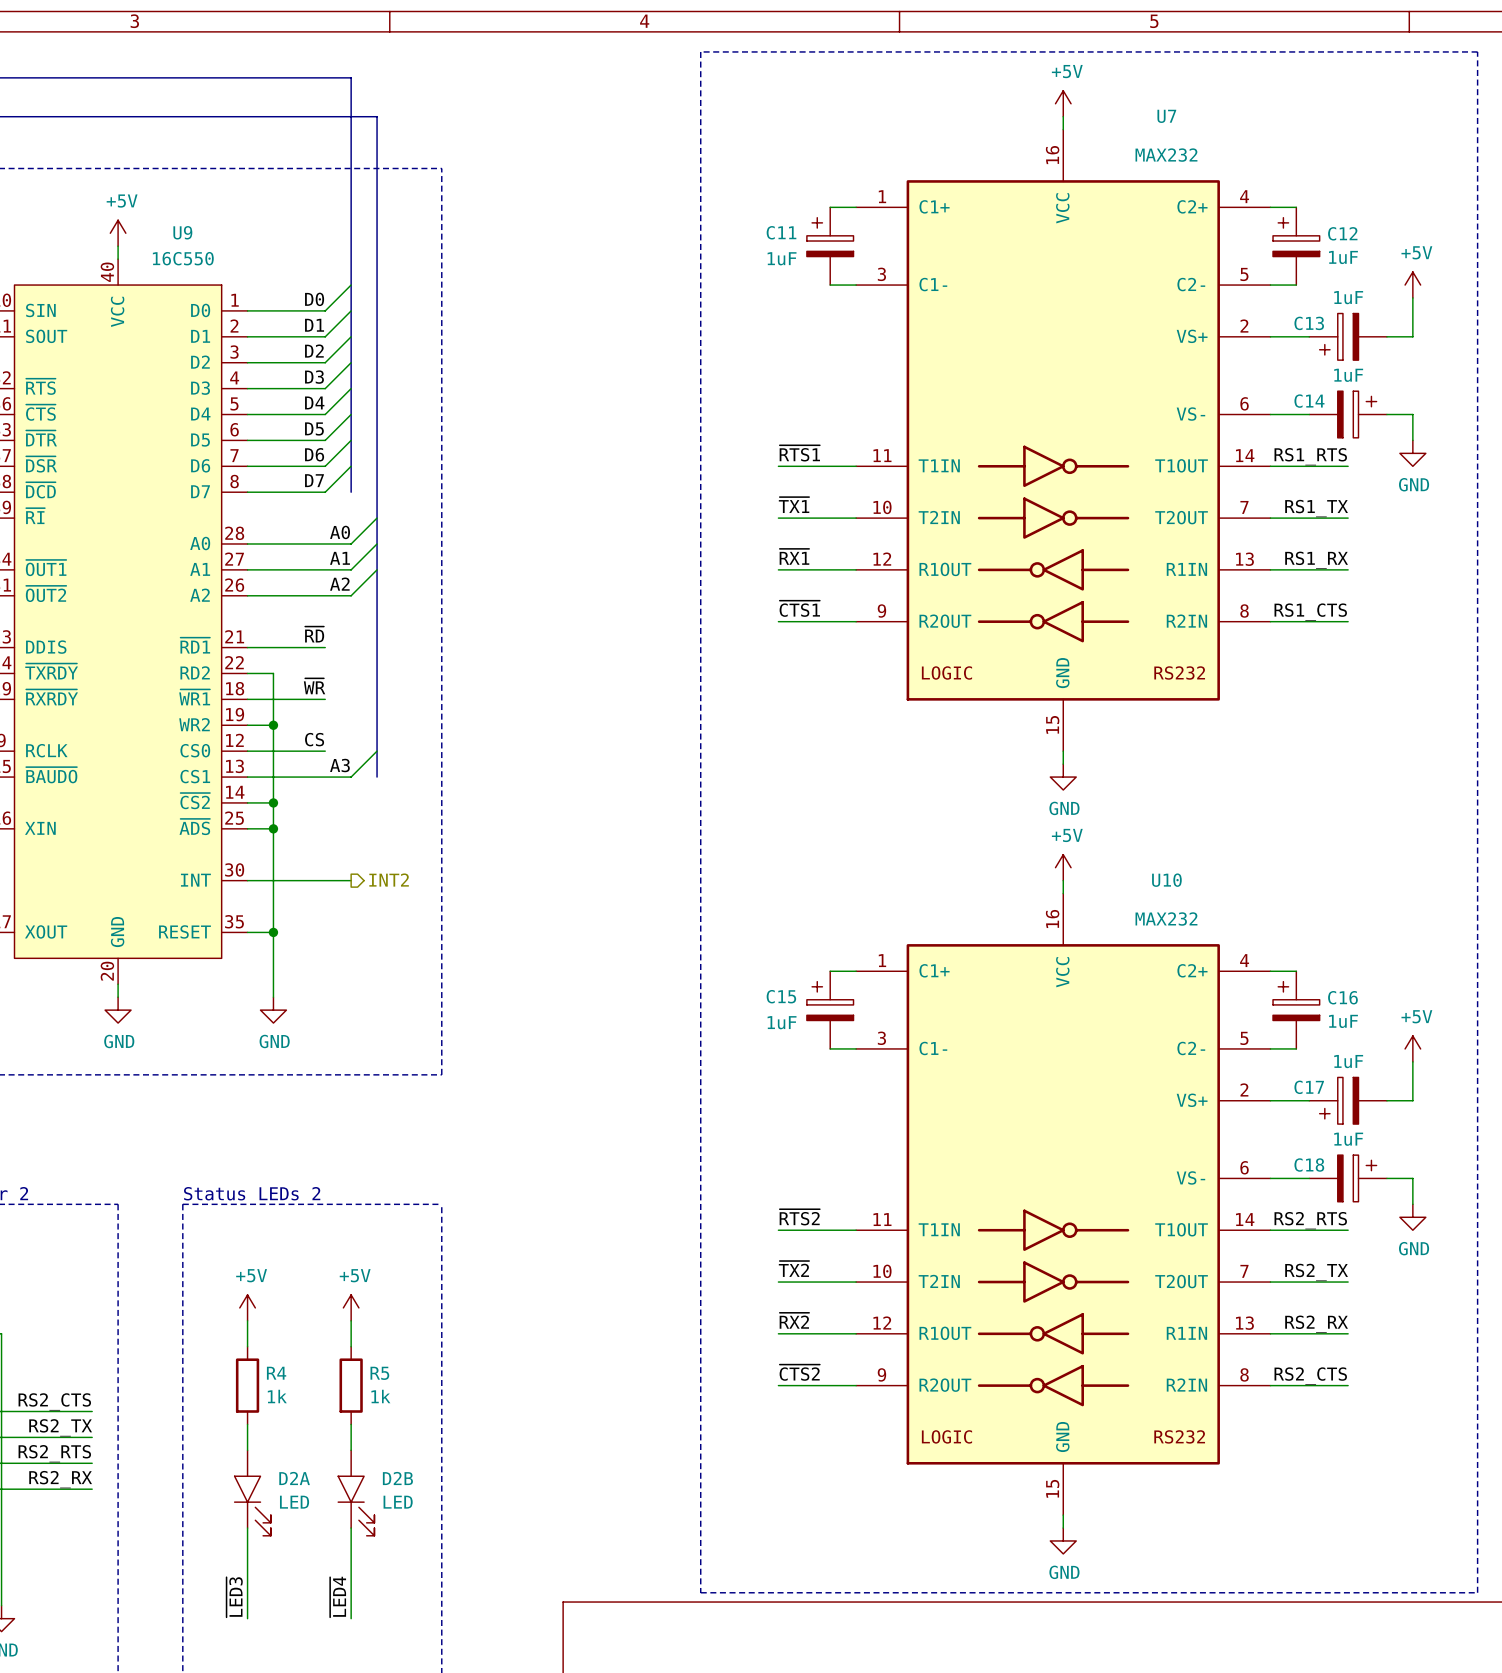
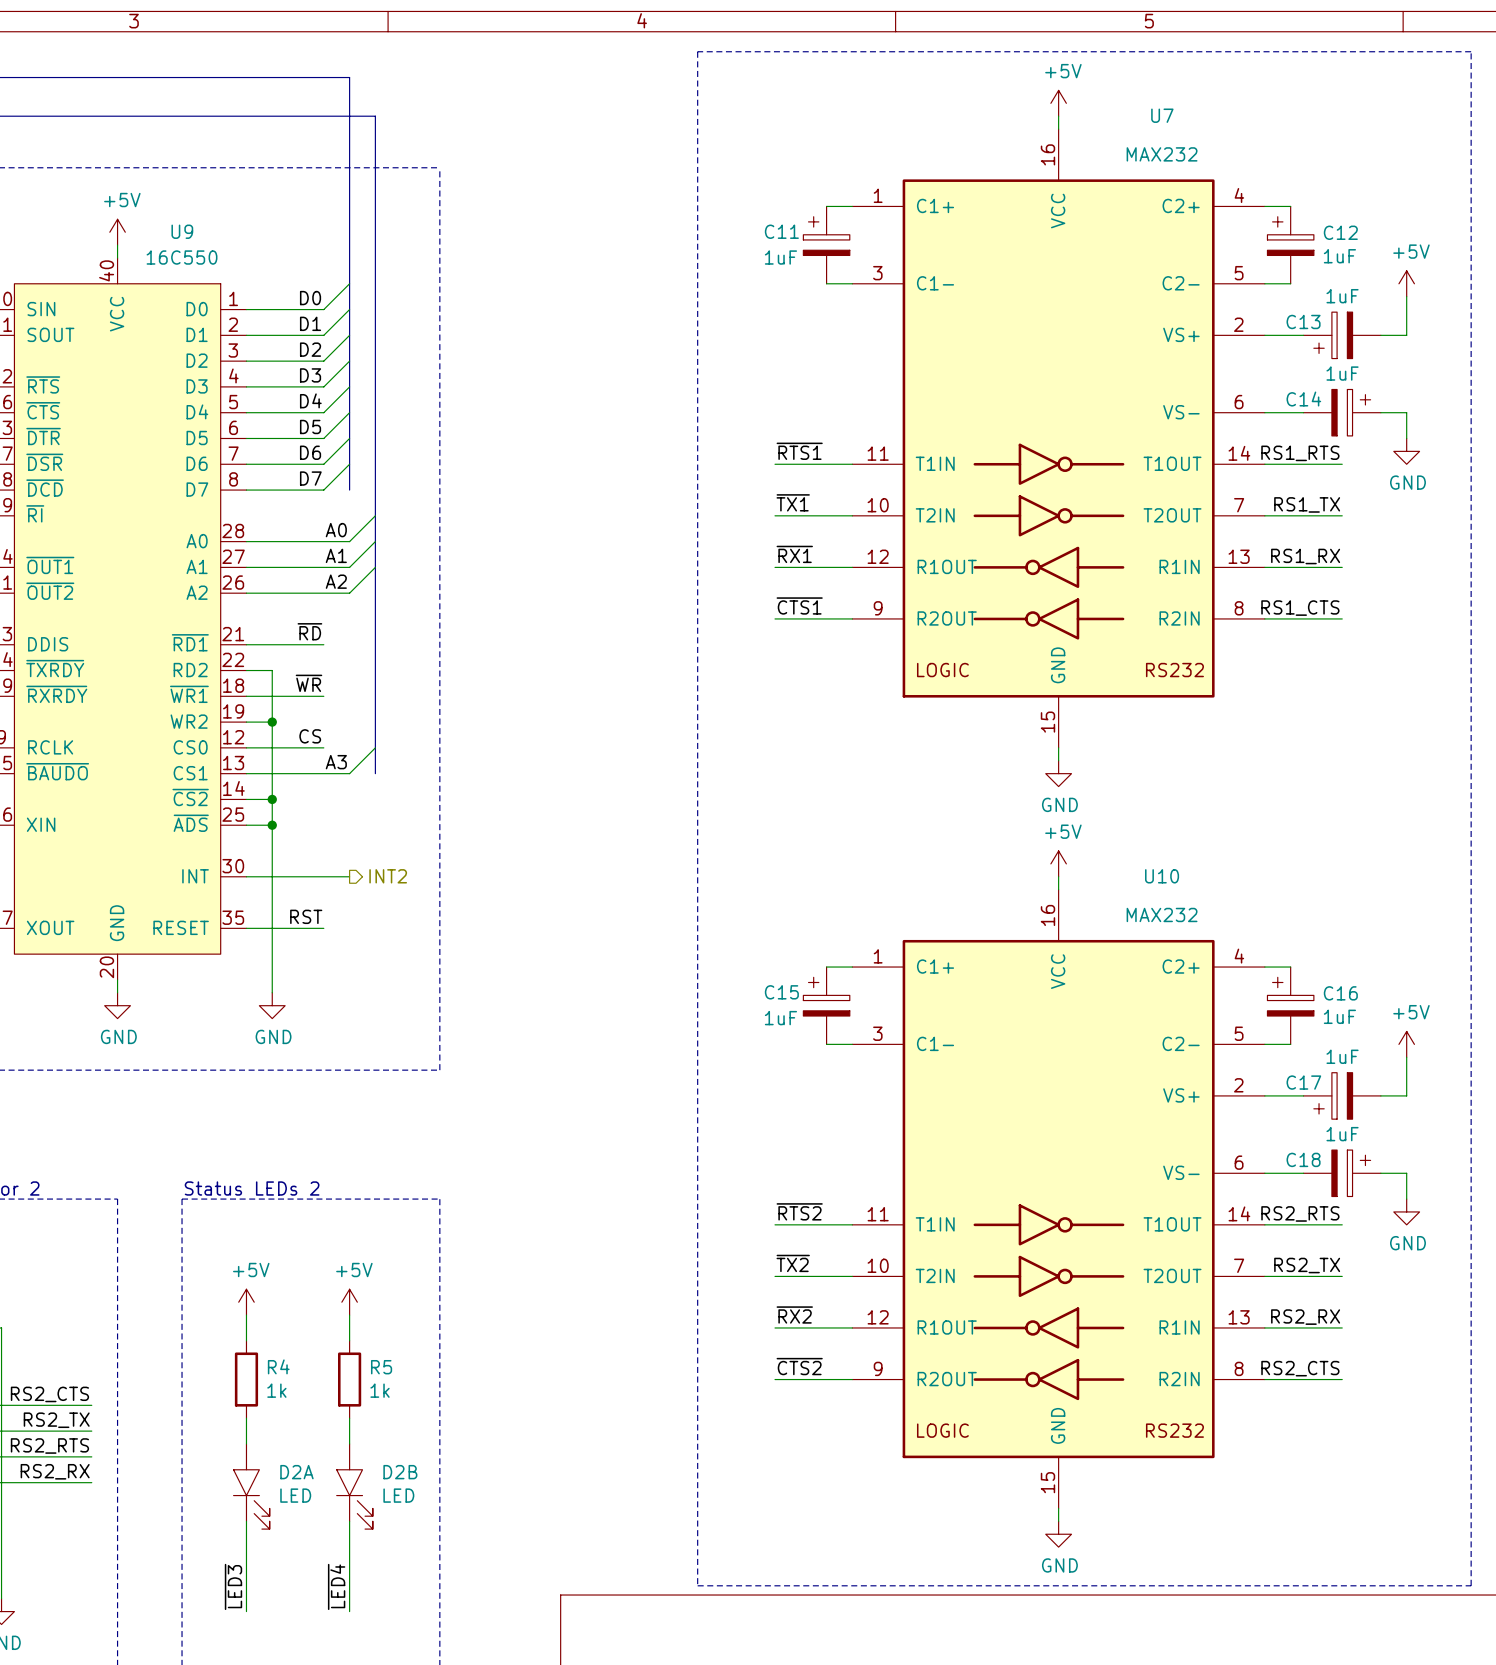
label: none -> RST (306, 916)
wire: none -> (272, 928) (323, 928)
junction: (273, 932) -> none

